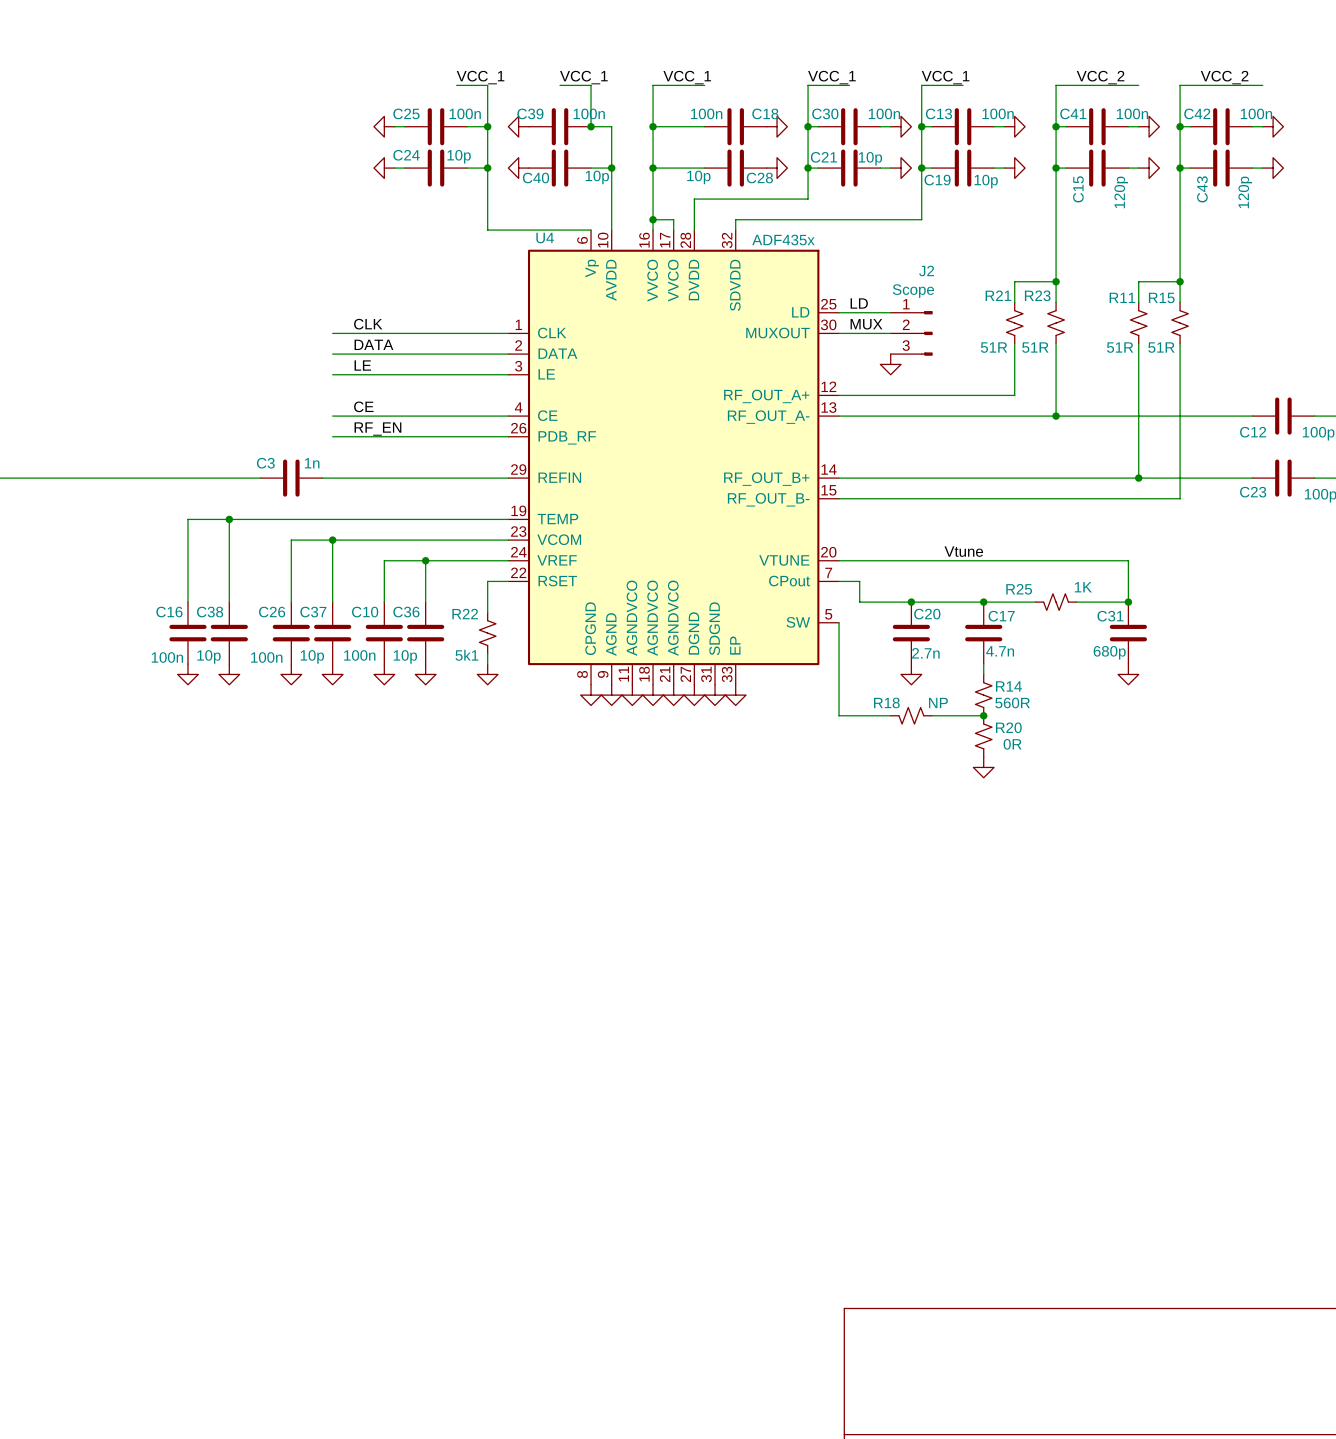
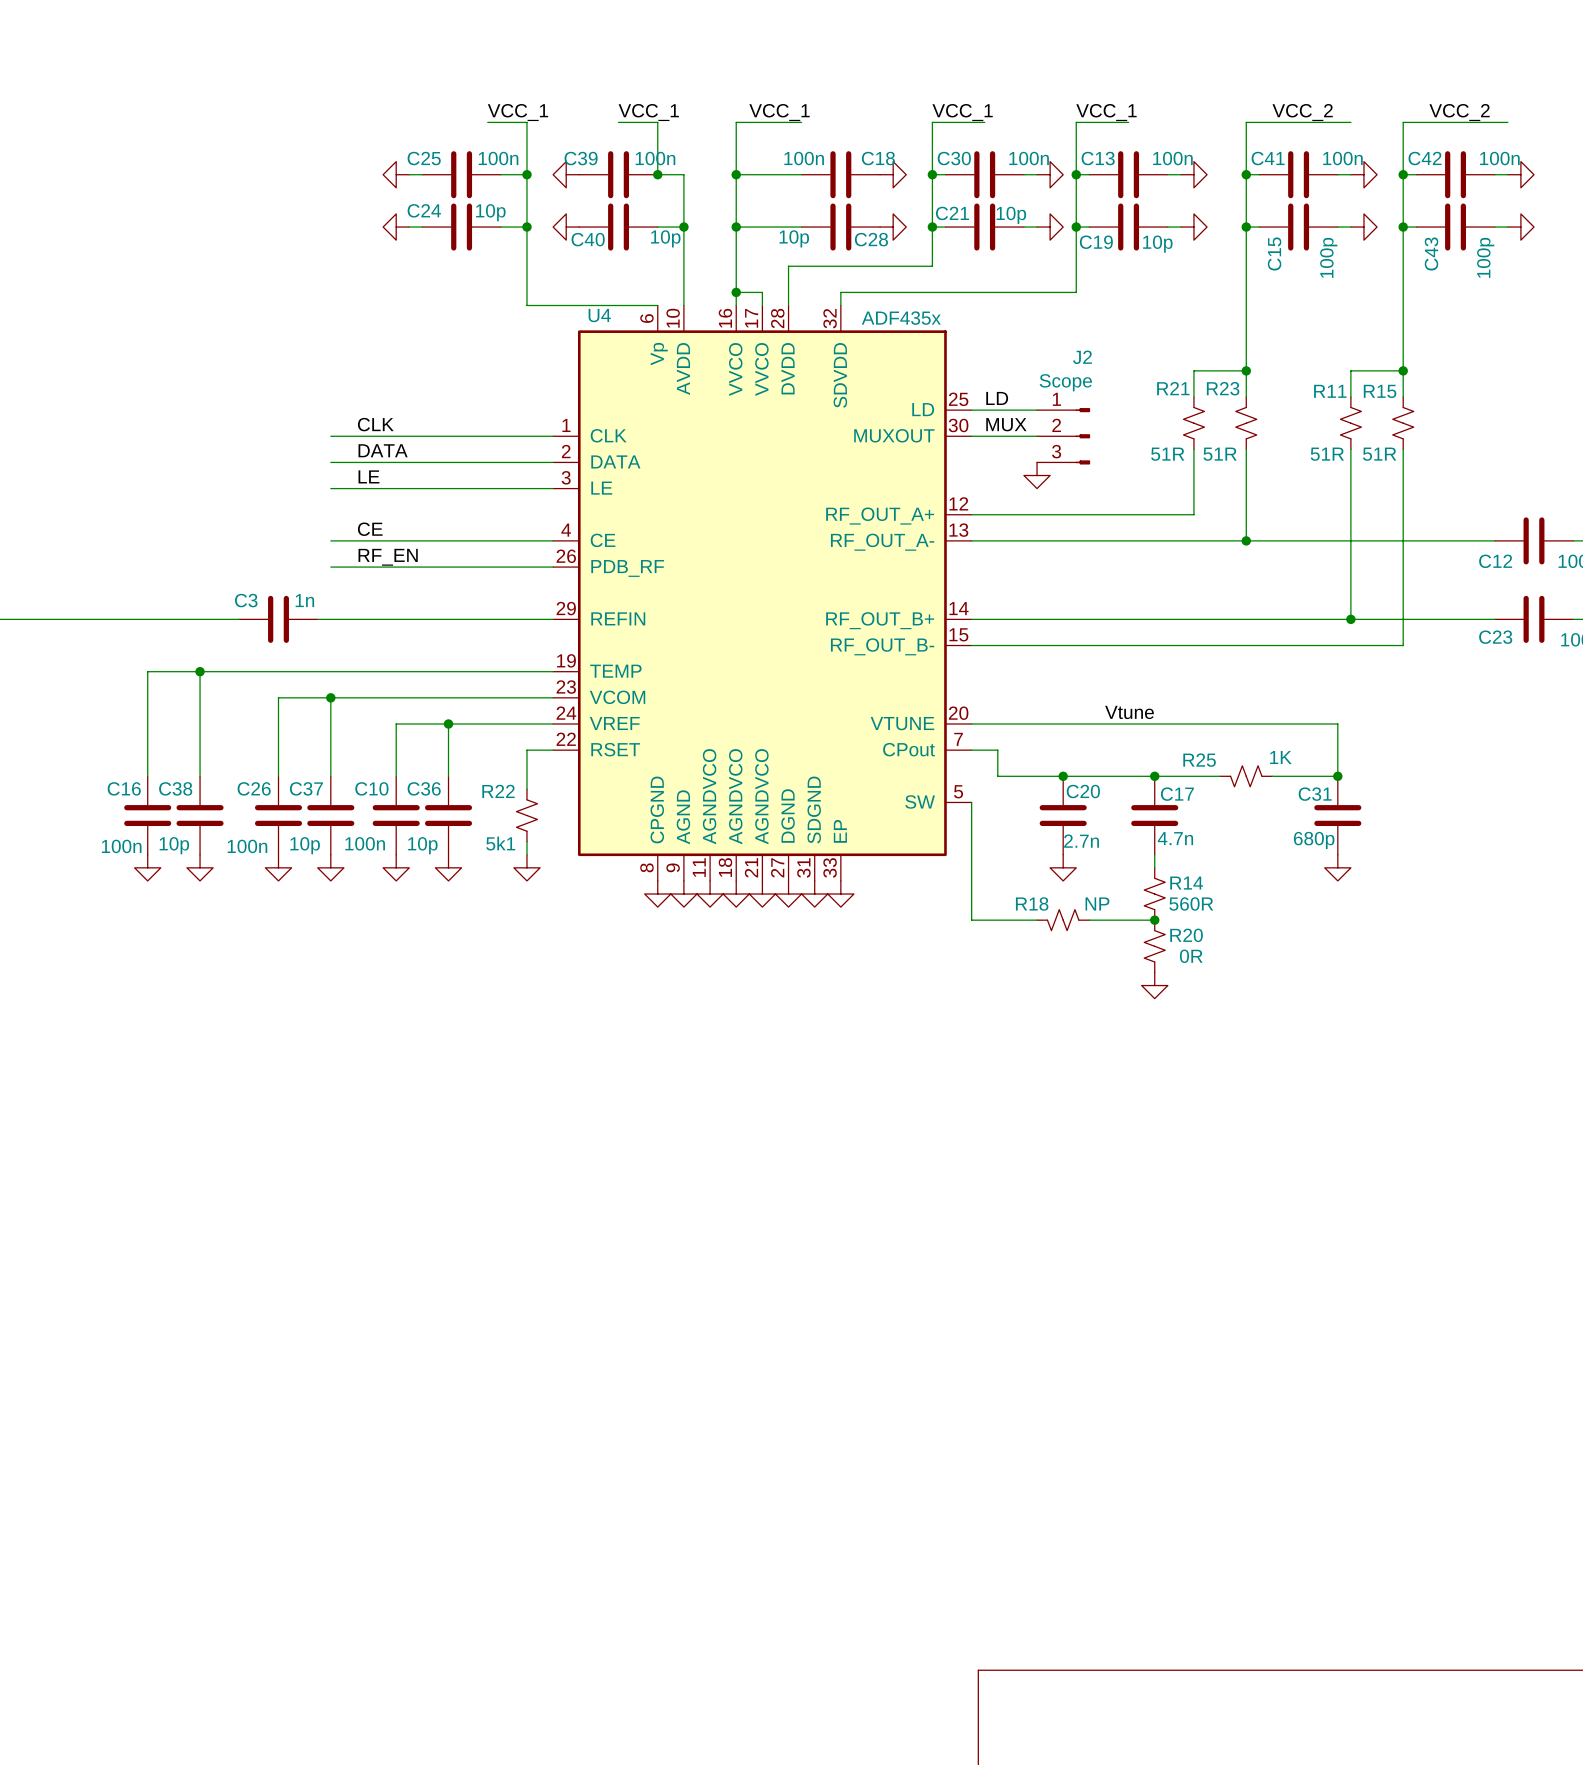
C15 value: 120p (1121, 192) -> 100p (1328, 257)
C43 value: 120p (1245, 192) -> 100p (1485, 257)

